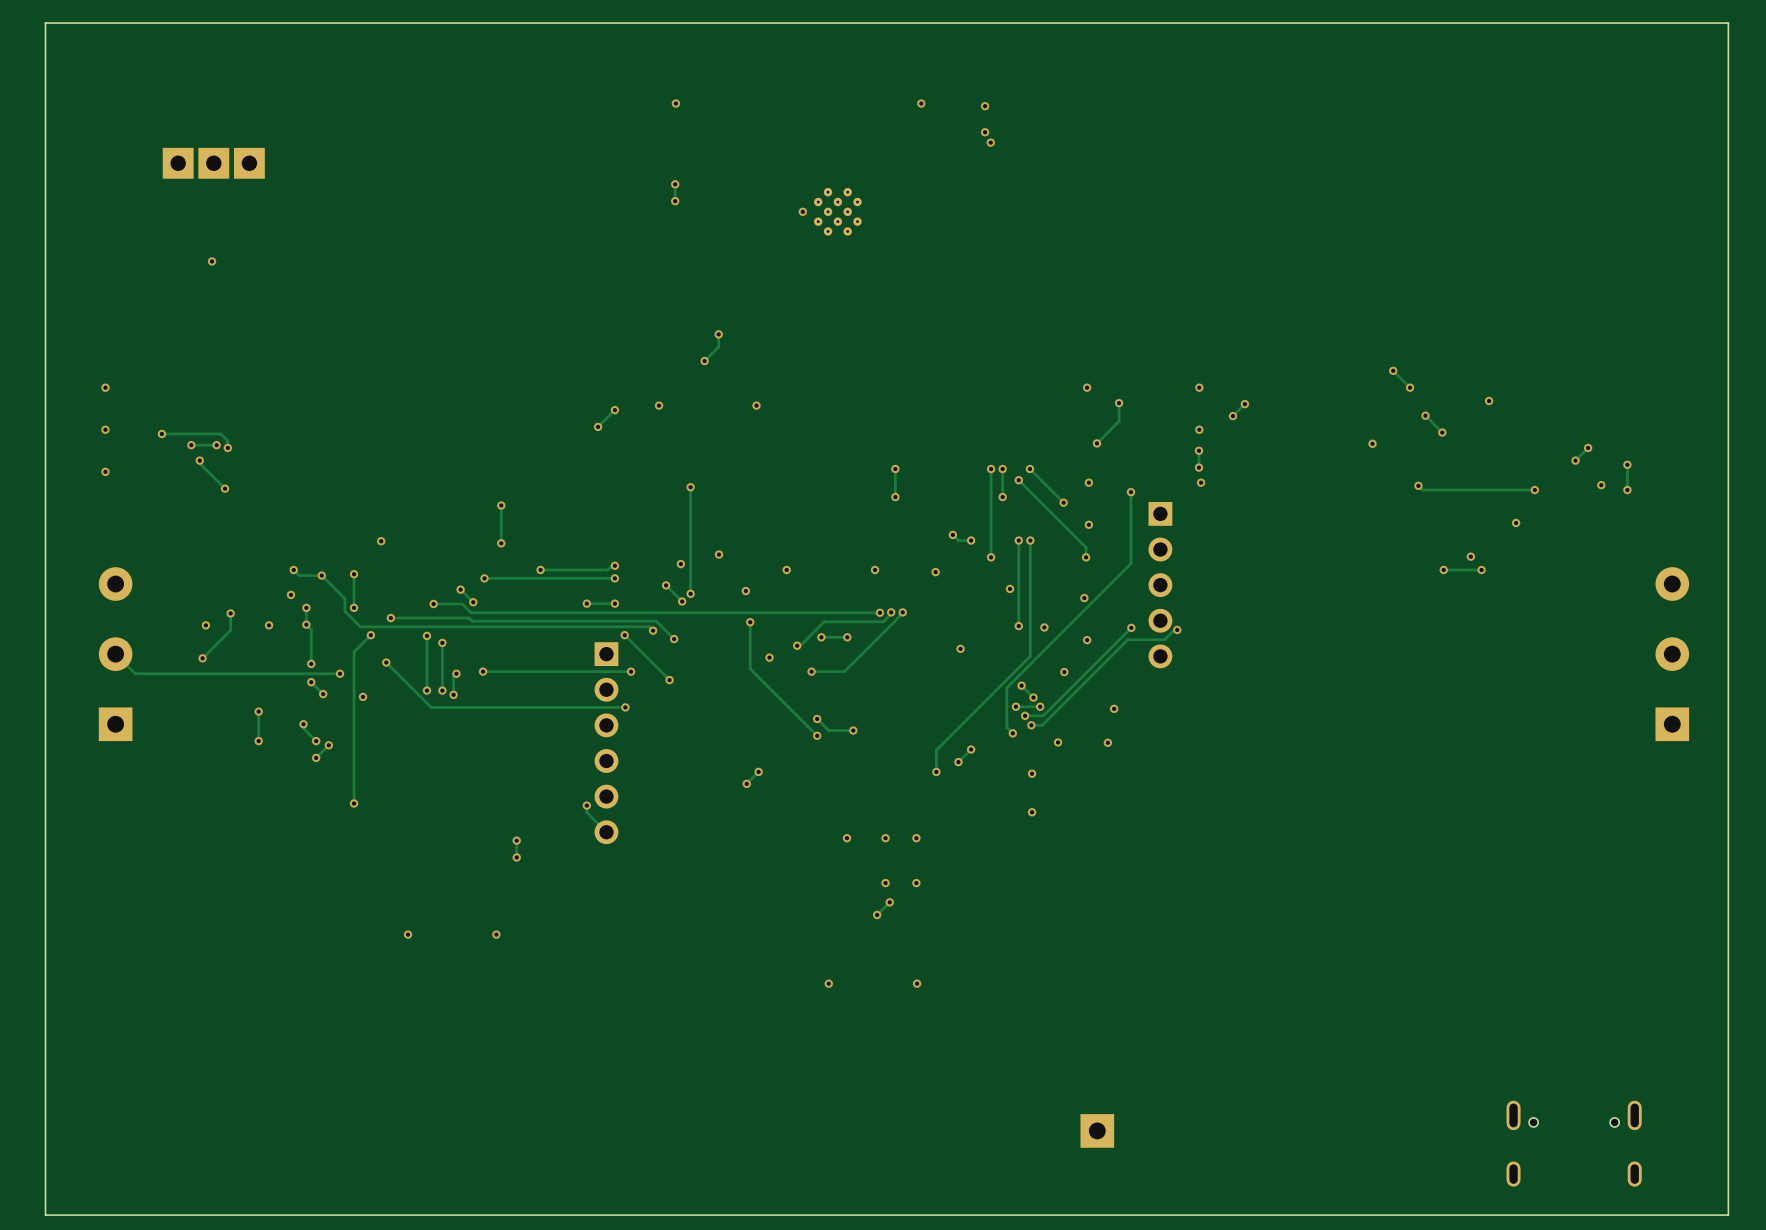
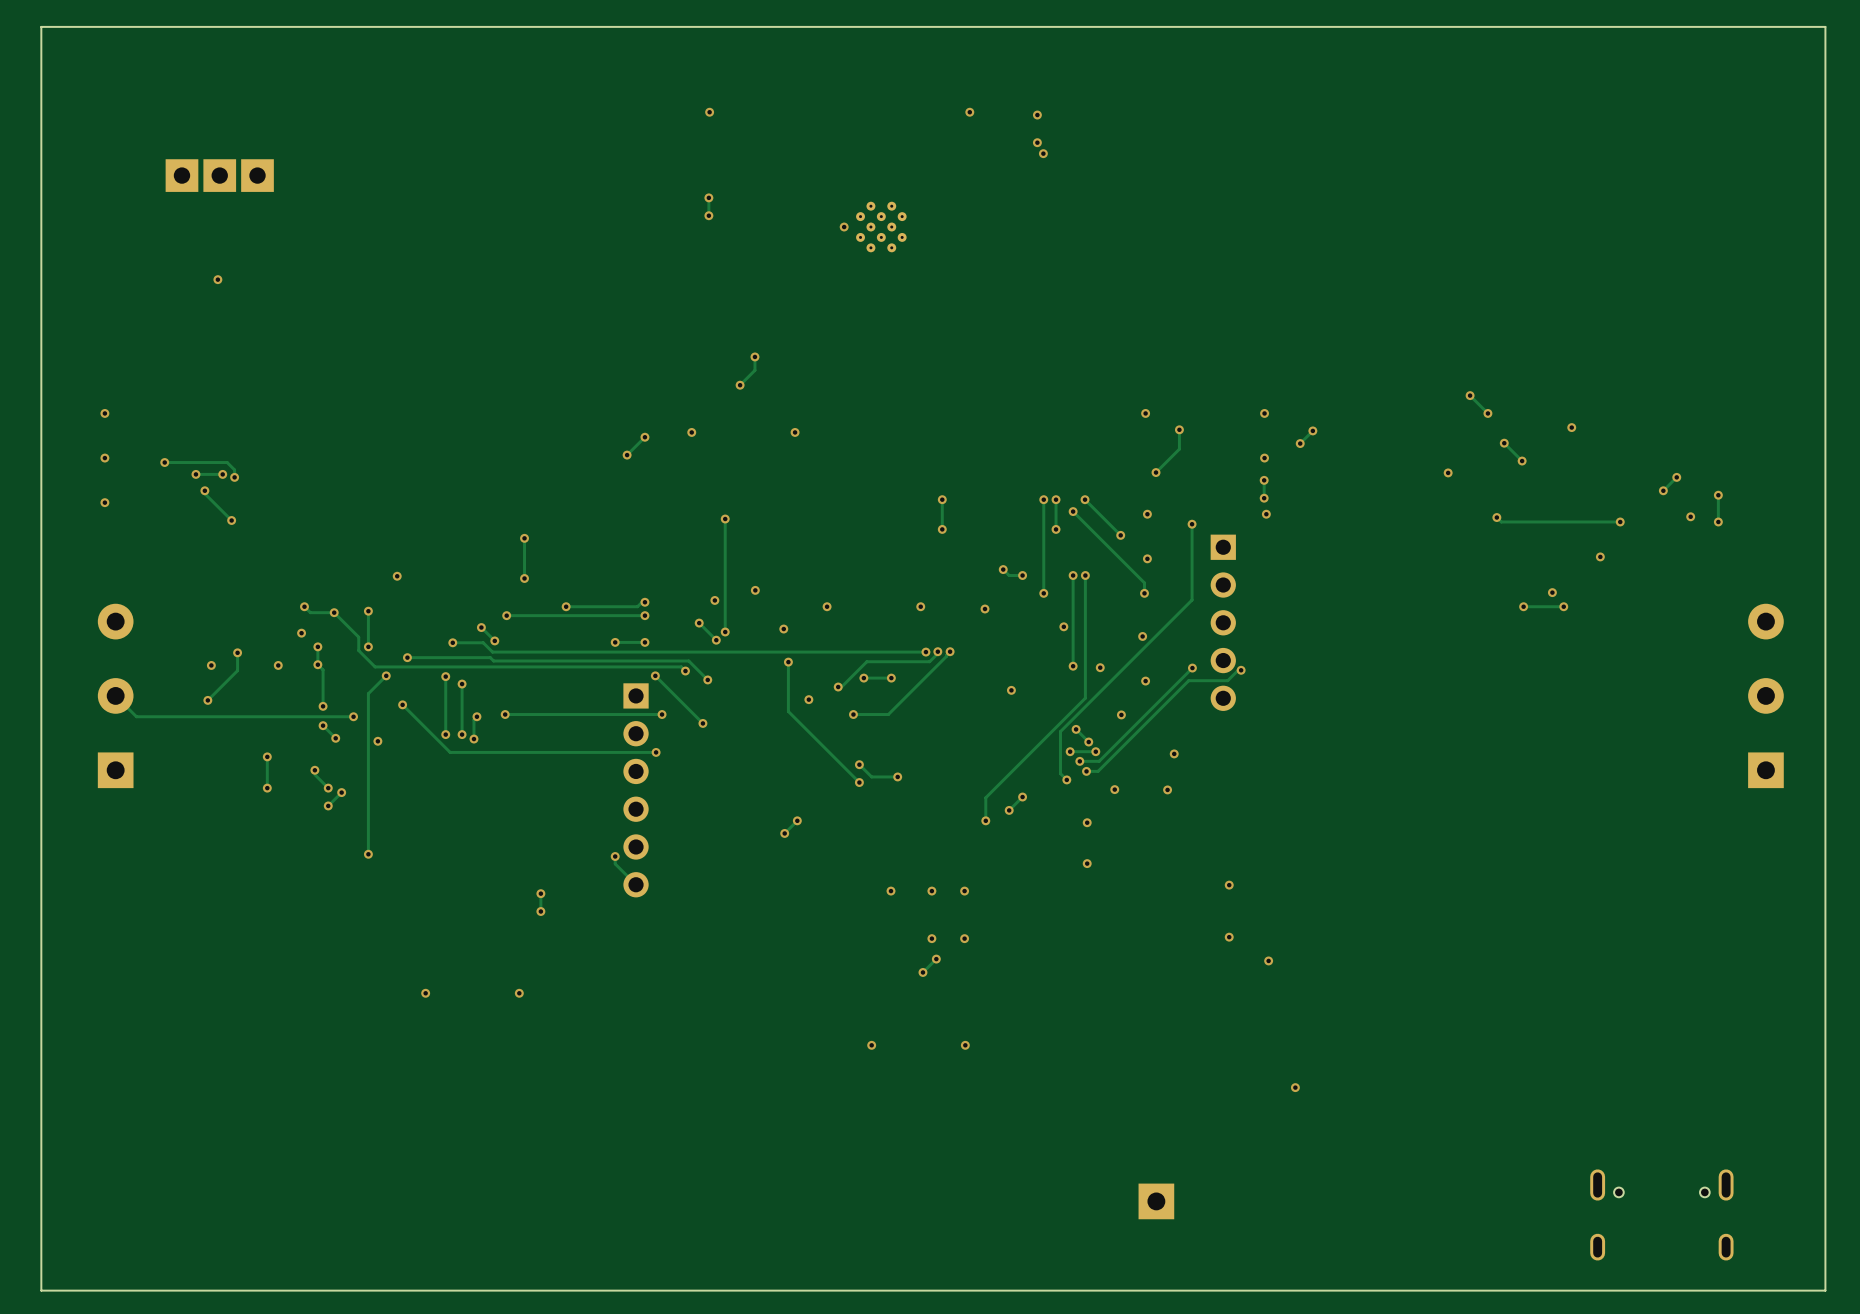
via: none -> (1229, 885)
via: none -> (1229, 937)
via: none -> (1268, 960)
via: none -> (1295, 1087)

